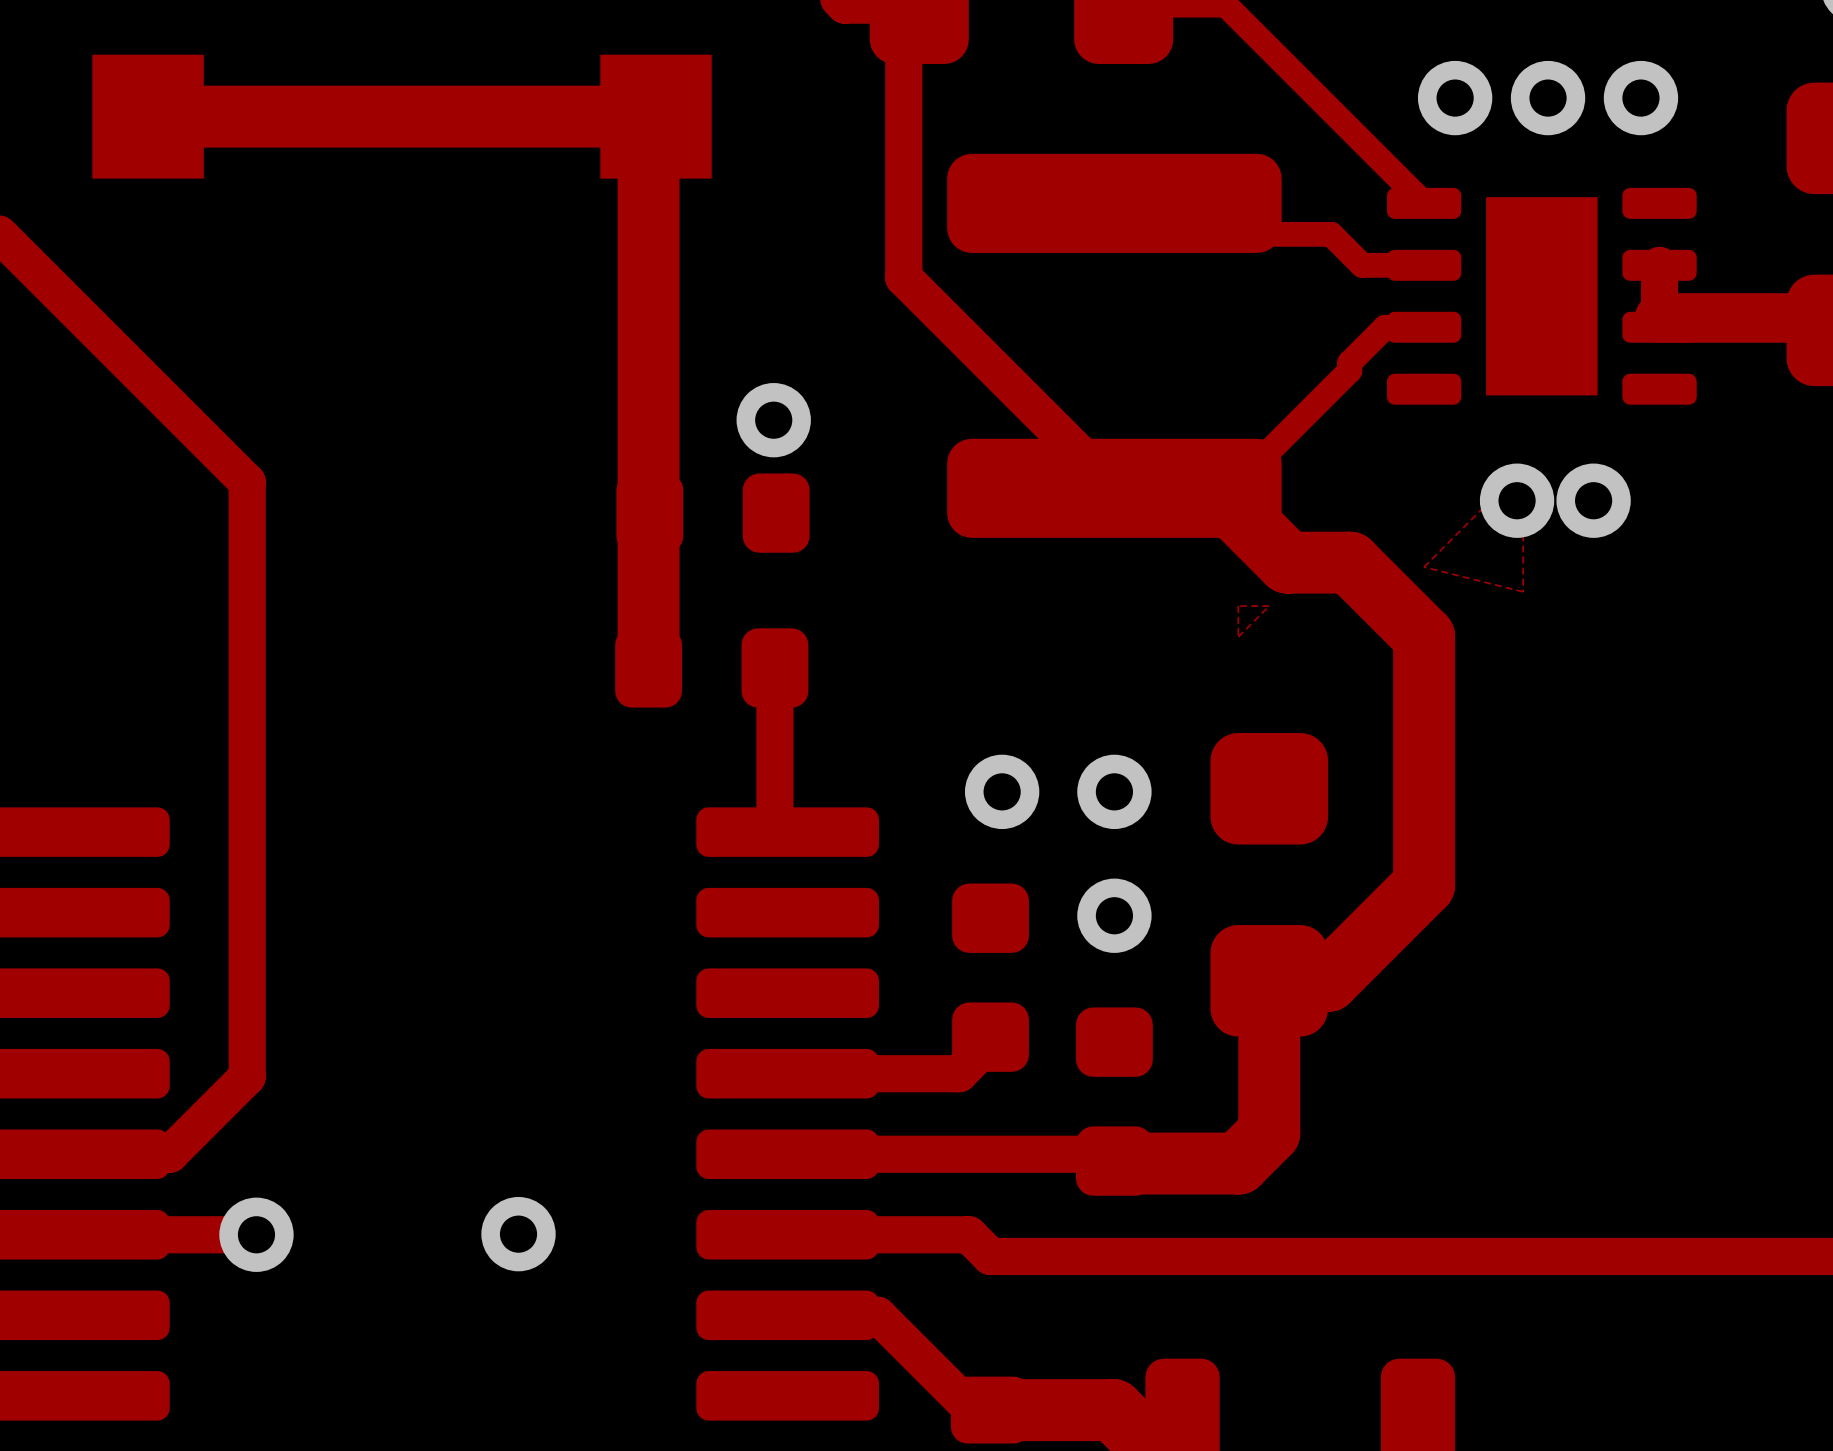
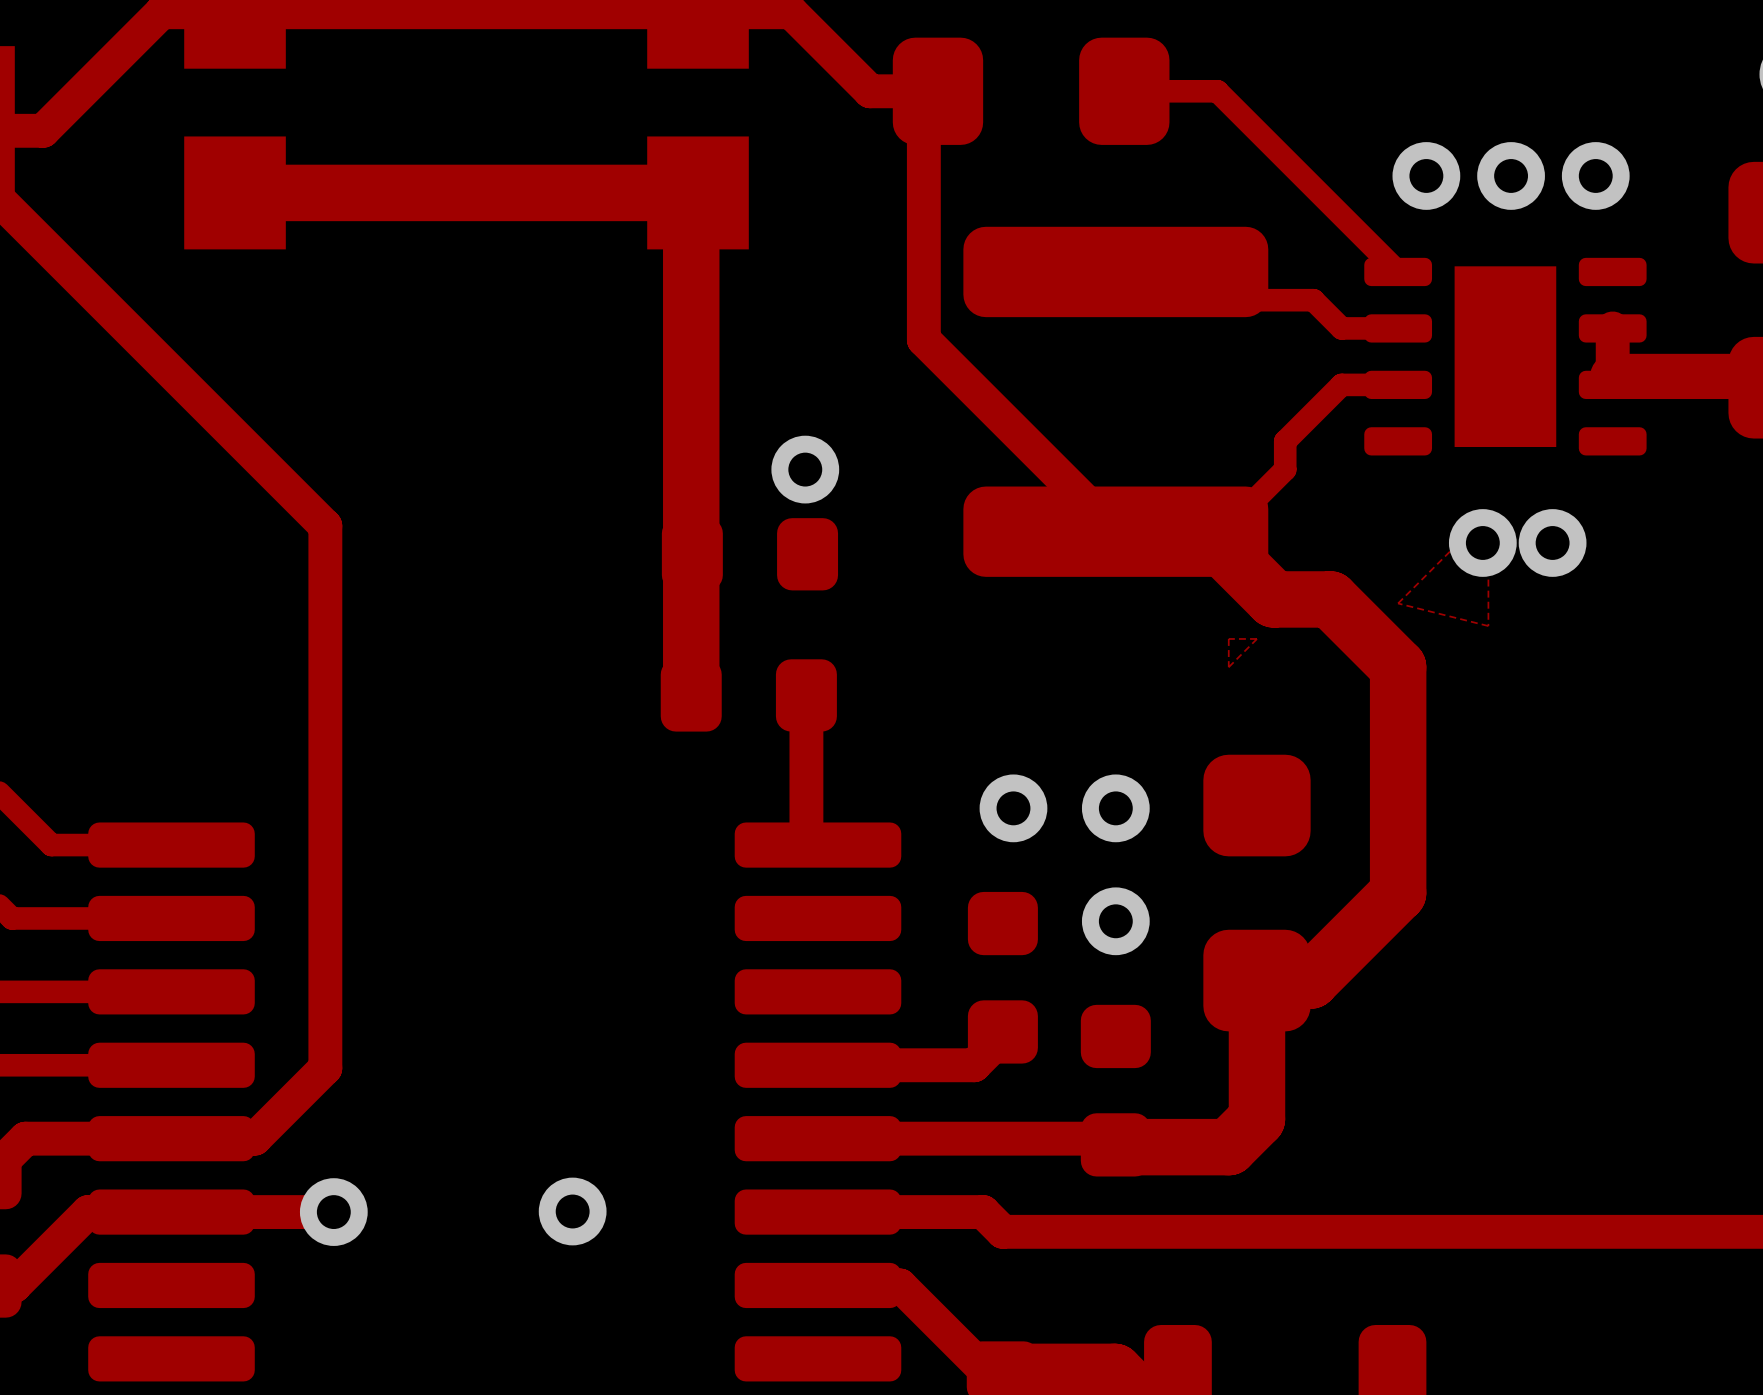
top track: (1385, 327) (1349, 362) (1349, 370) (1300, 420) -> (1362, 384) (1341, 384) (1285, 441) (1285, 469)

